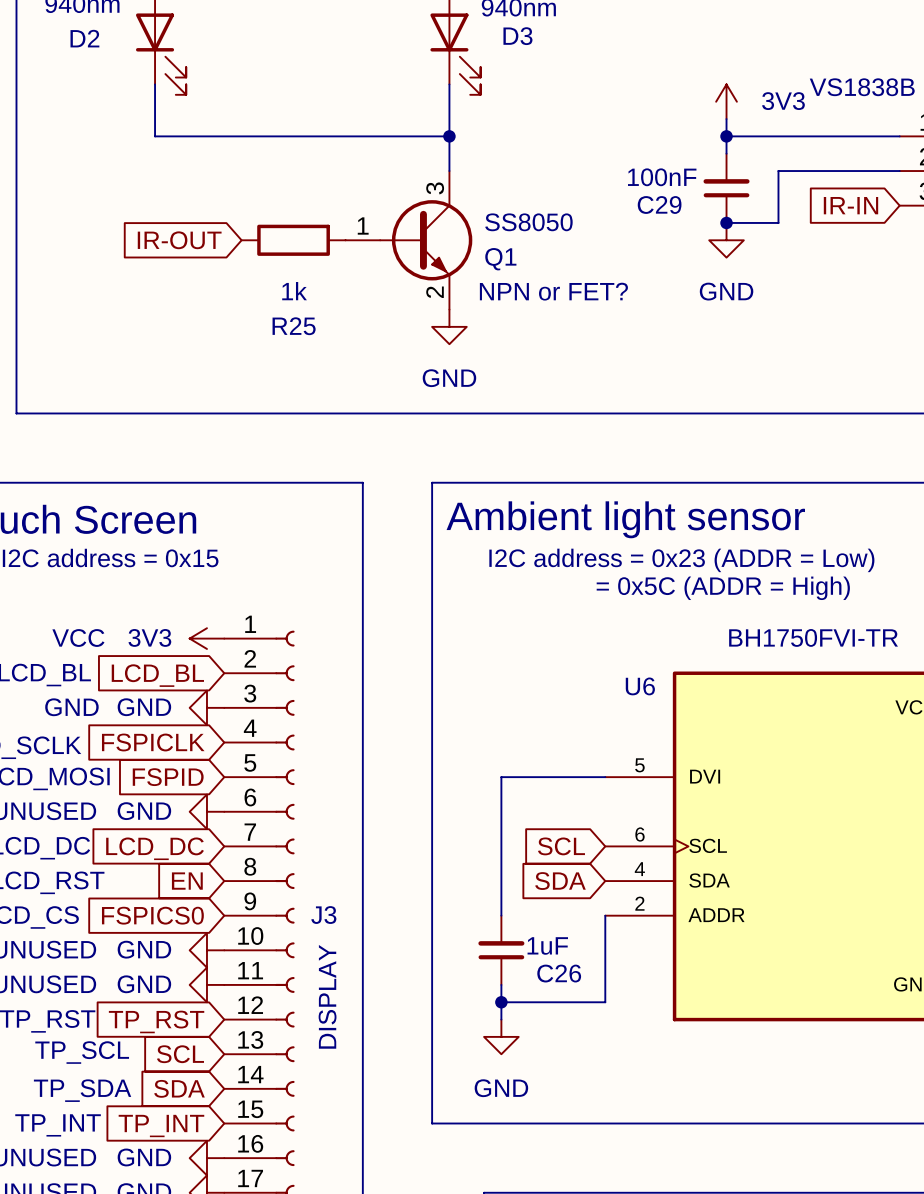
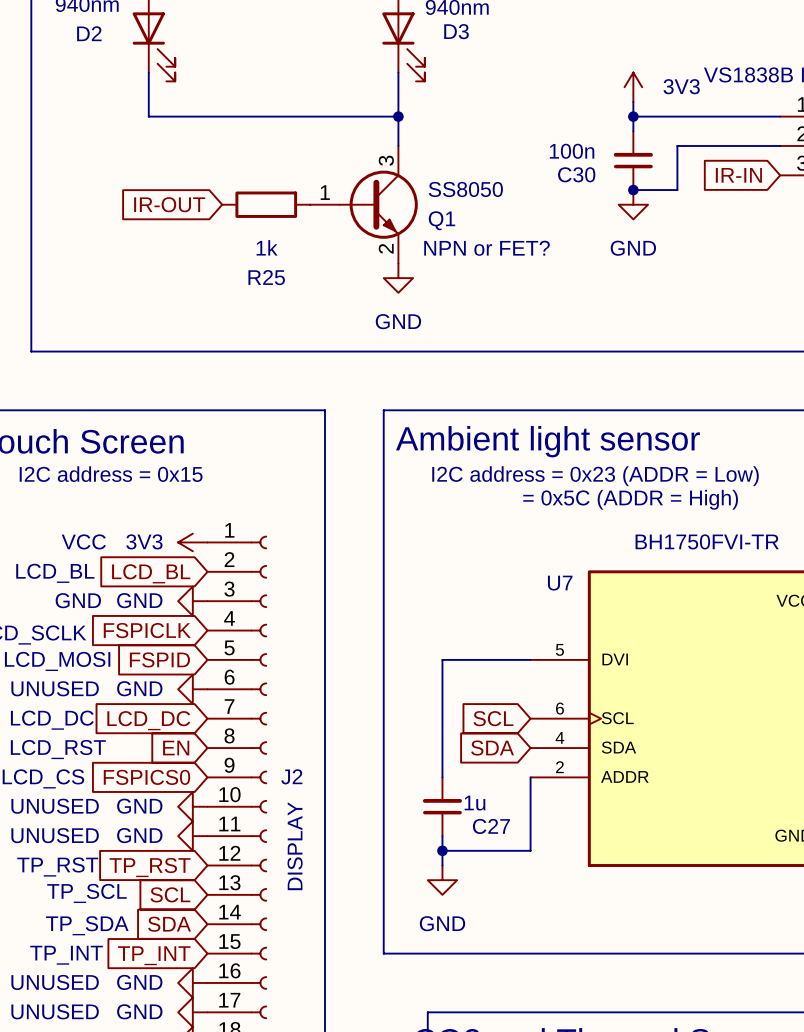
C29 value: 100nF (662, 177) -> 100n (572, 151)
C29 name: C29 (659, 205) -> C30 (576, 174)
U6 name: U6 (640, 686) -> U7 (560, 583)
J3 name: J3 (323, 915) -> J2 (291, 776)
C26 value: 1uF (547, 945) -> 1u (474, 803)
C26 name: C26 (559, 973) -> C27 (491, 826)

